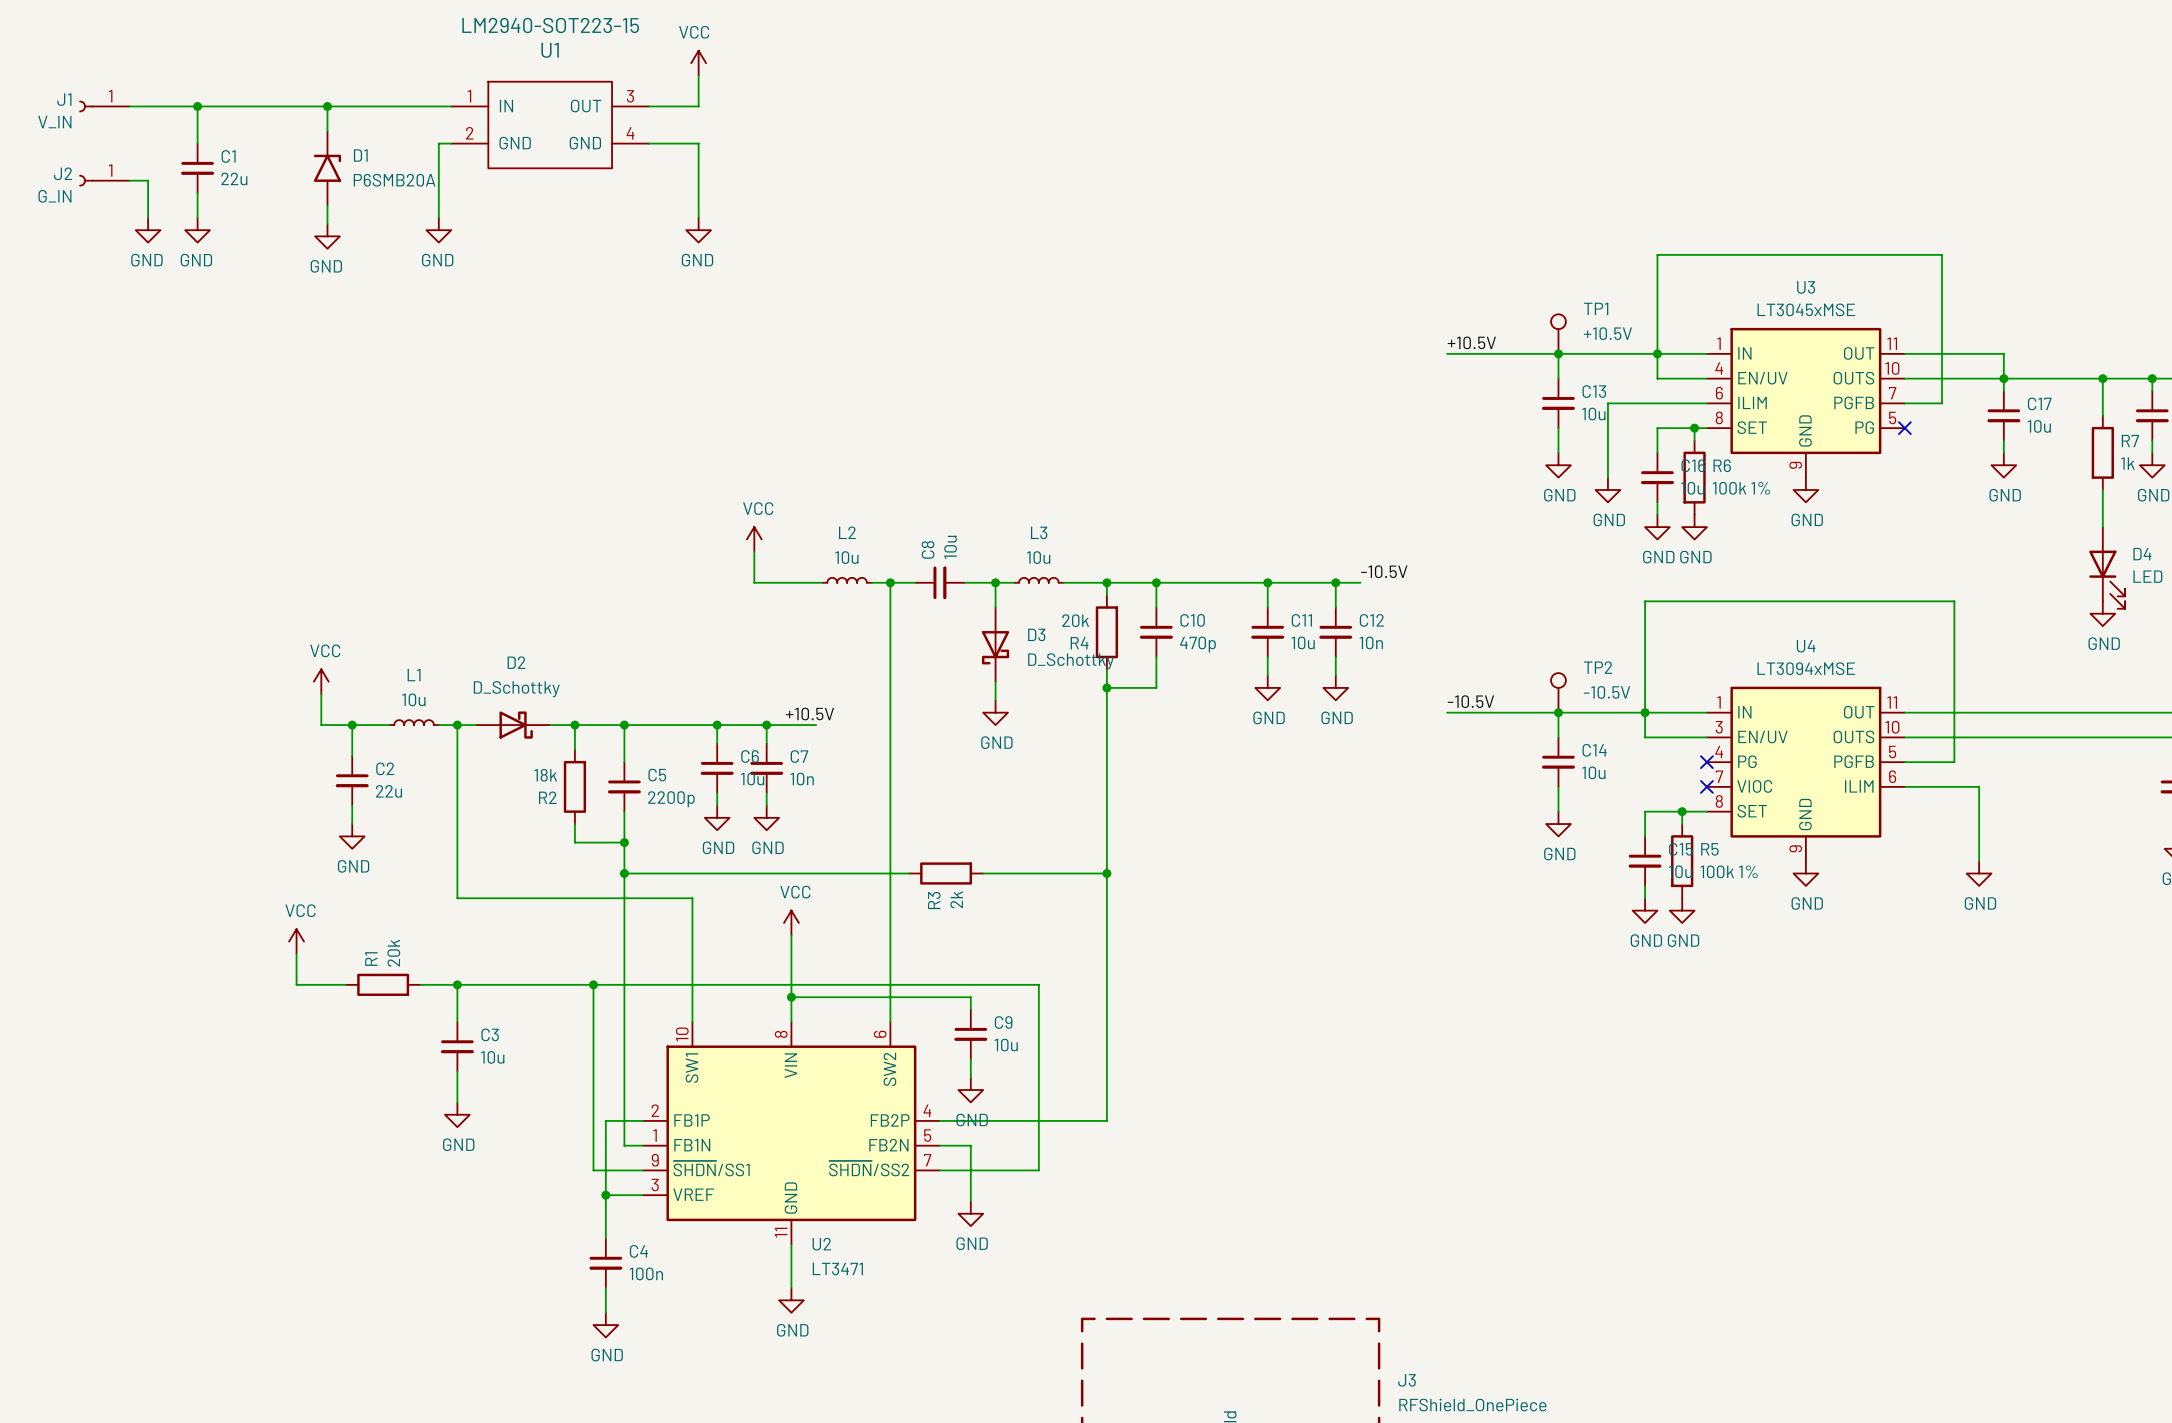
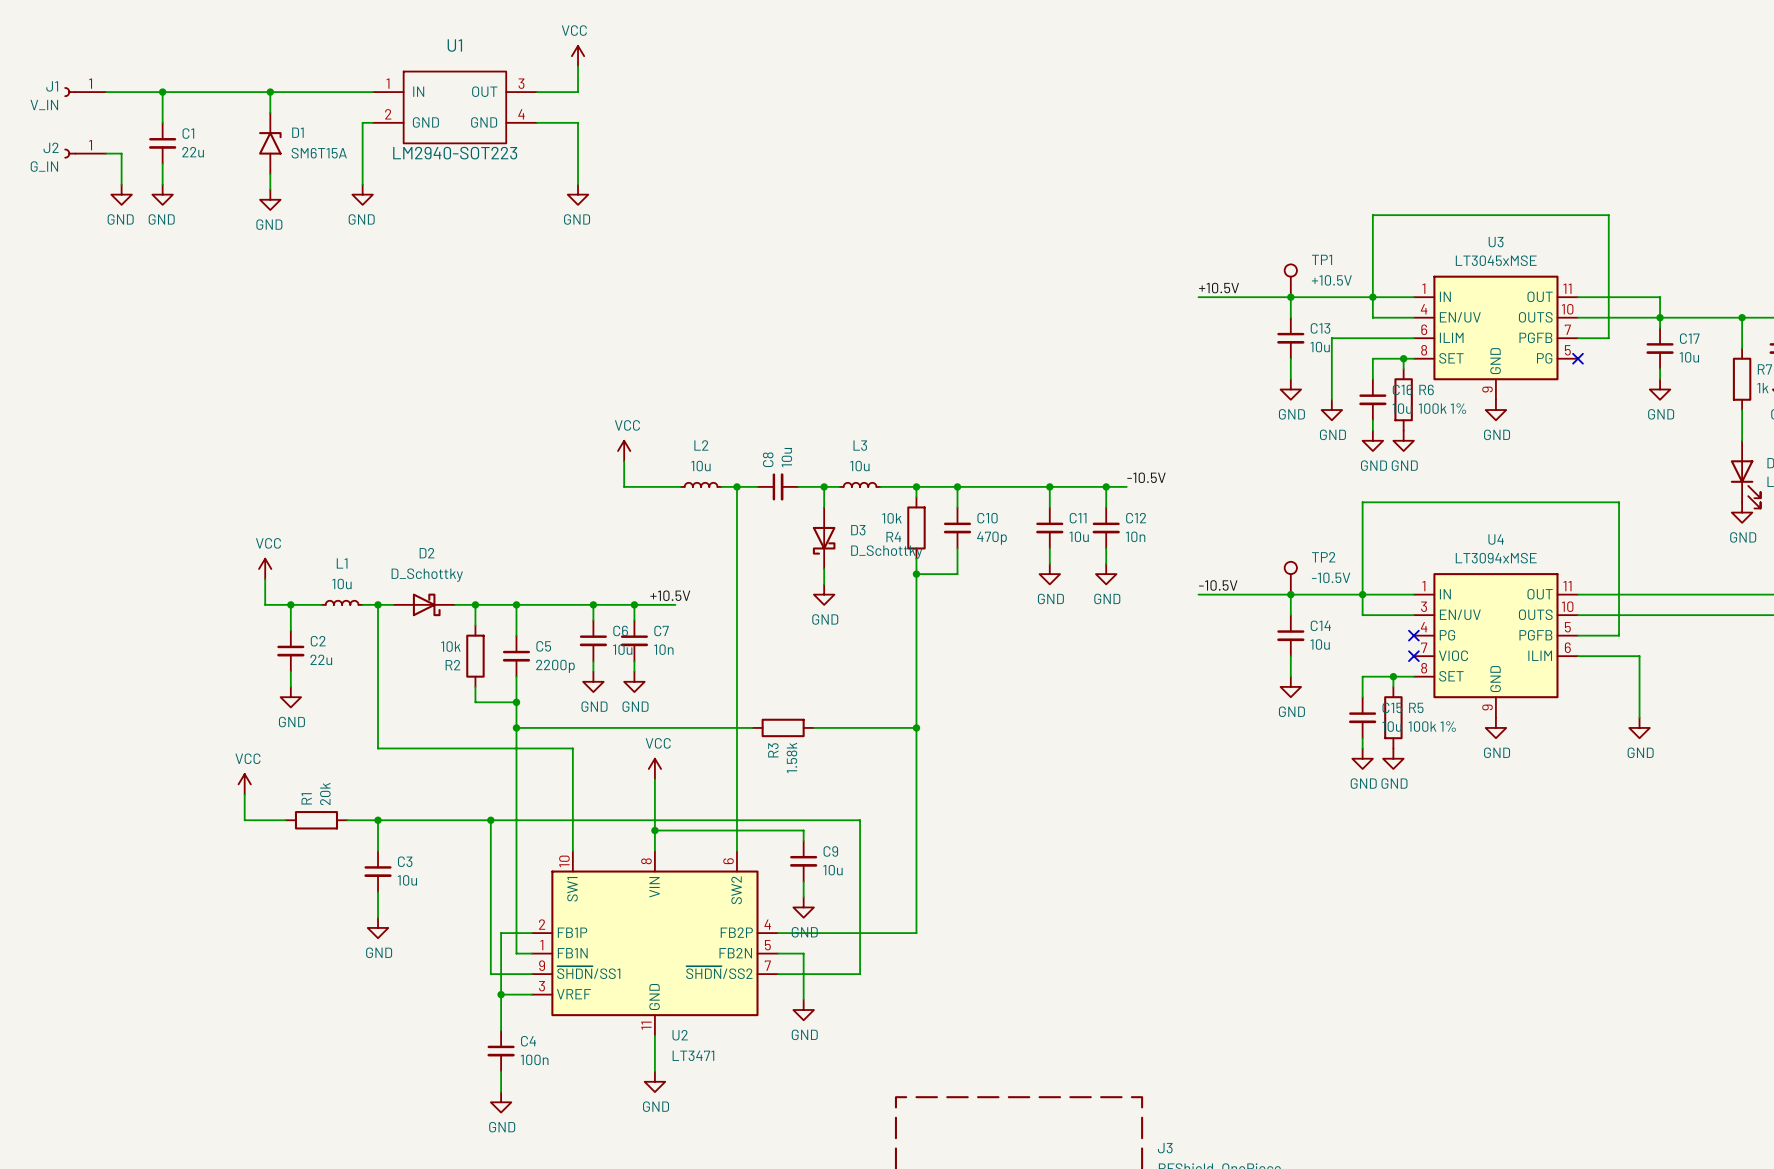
U1 value: LM2940-SOT223-15 (550, 25) -> LM2940-SOT223 (455, 153)
D1 value: P6SMB20A (394, 180) -> SM6T15A (319, 153)
R4 value: 20k (1075, 620) -> 10k (891, 518)
R2 value: 18k (545, 775) -> 10k (450, 646)
R3 value: 2k (956, 899) -> 1.58k (791, 757)

